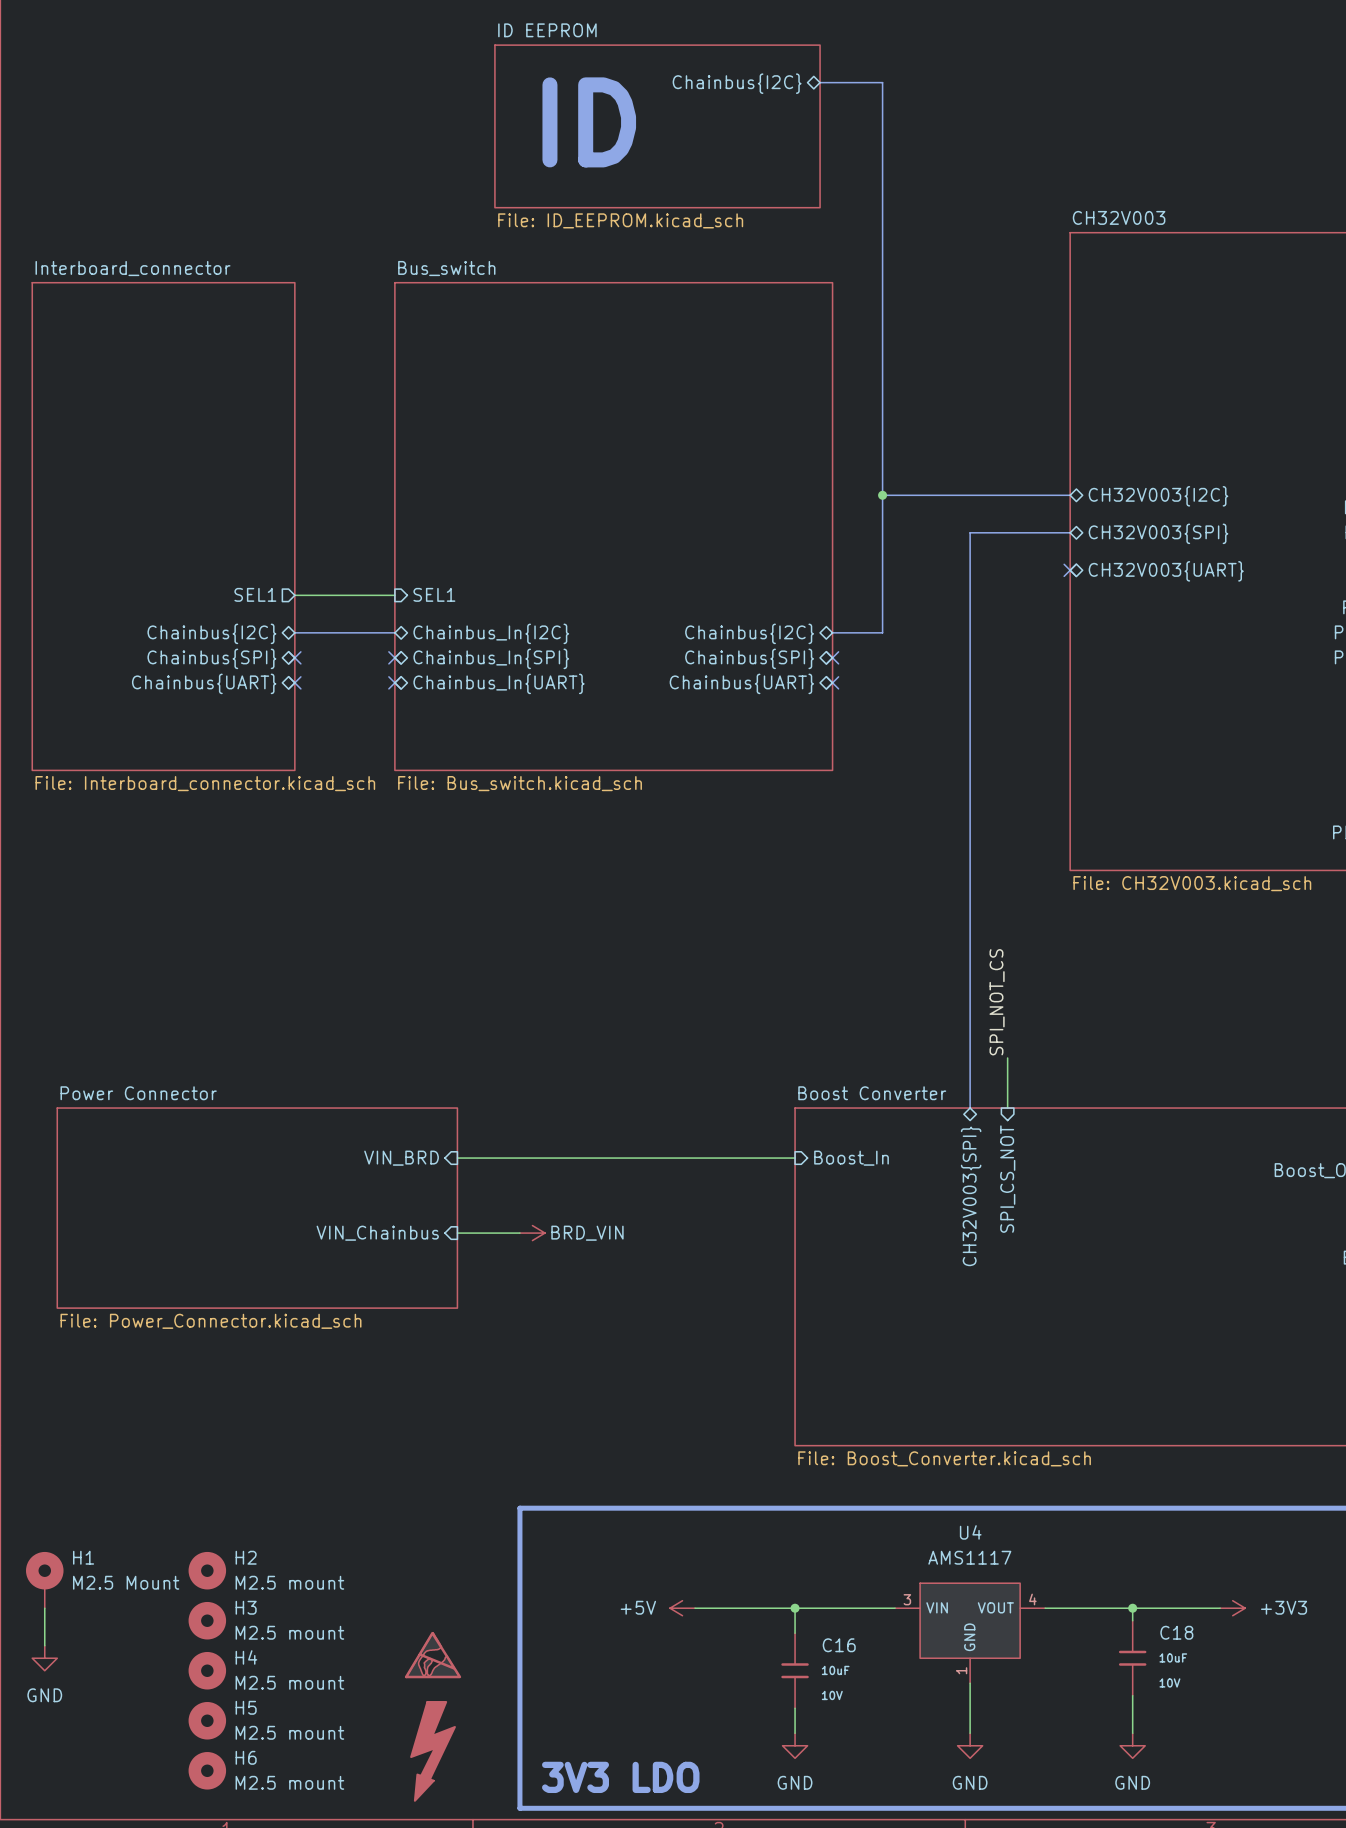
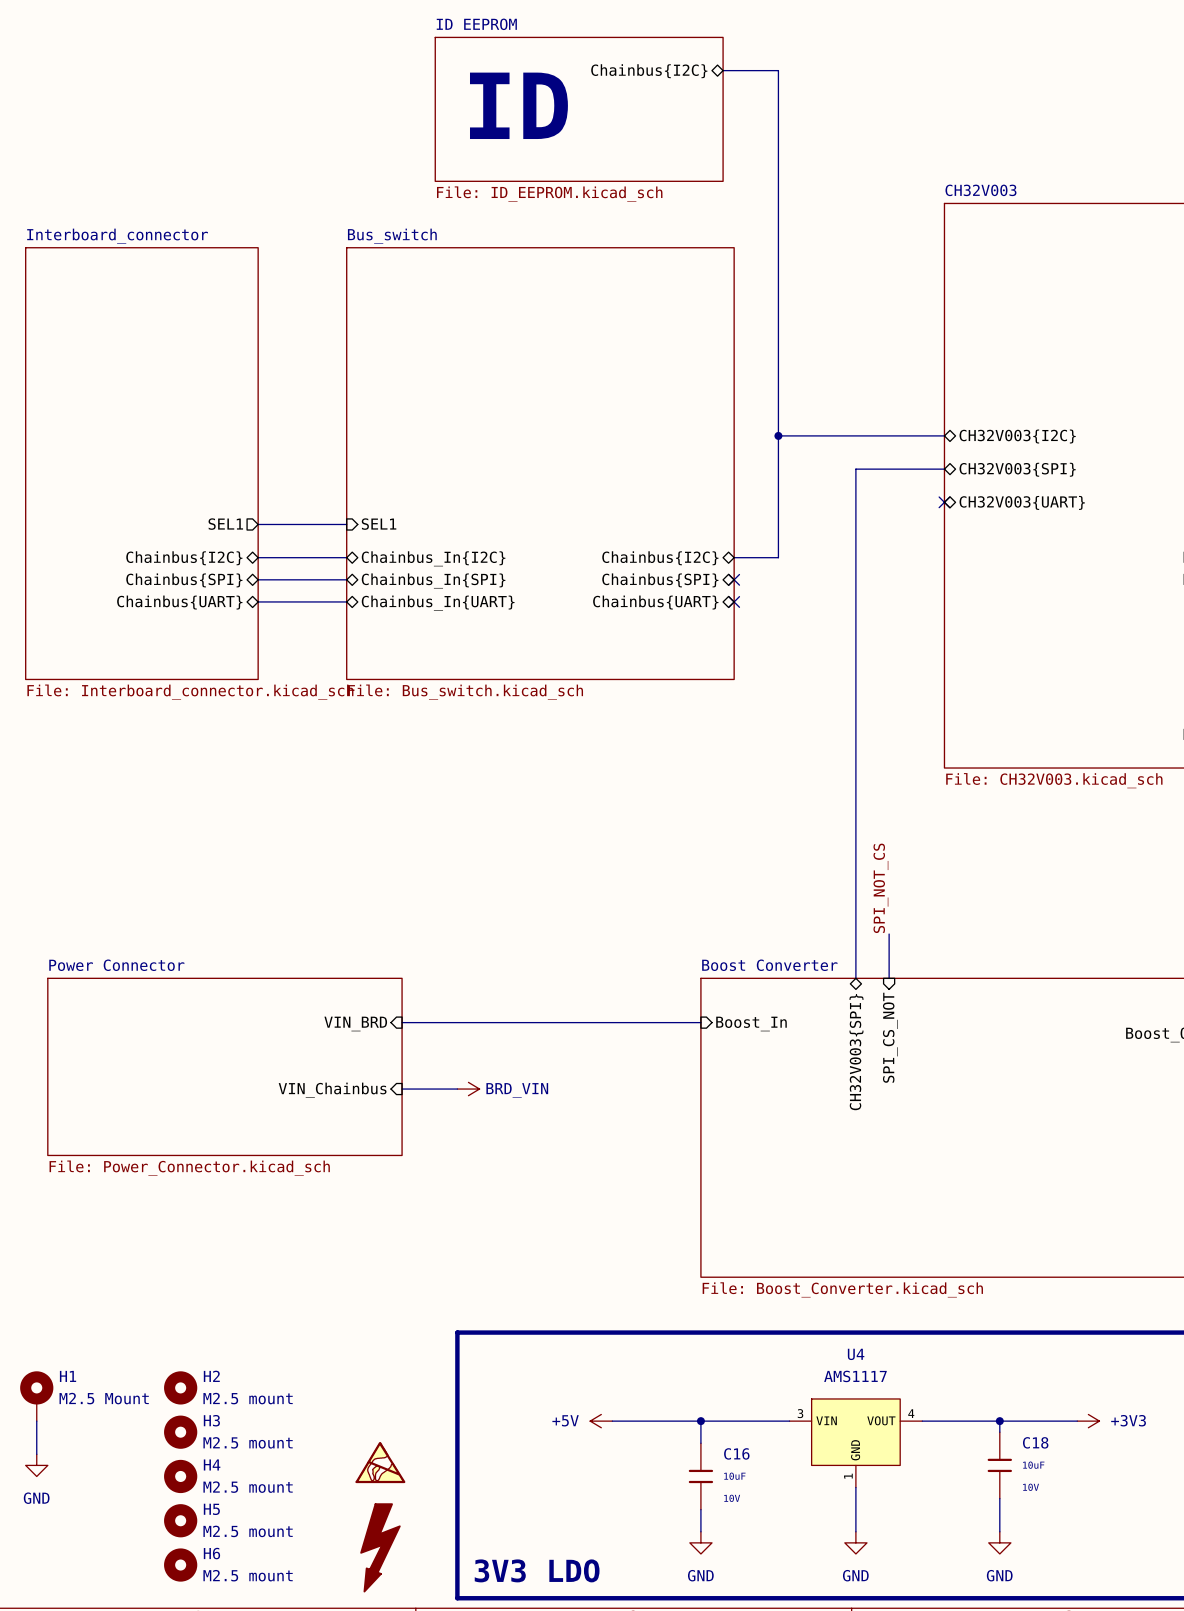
bus: none -> (258, 579) (346, 579)
no-connect mark: (294, 657) -> none
no-connect mark: (394, 657) -> none
bus: none -> (258, 601) (346, 601)
no-connect mark: (294, 682) -> none
no-connect mark: (394, 682) -> none

